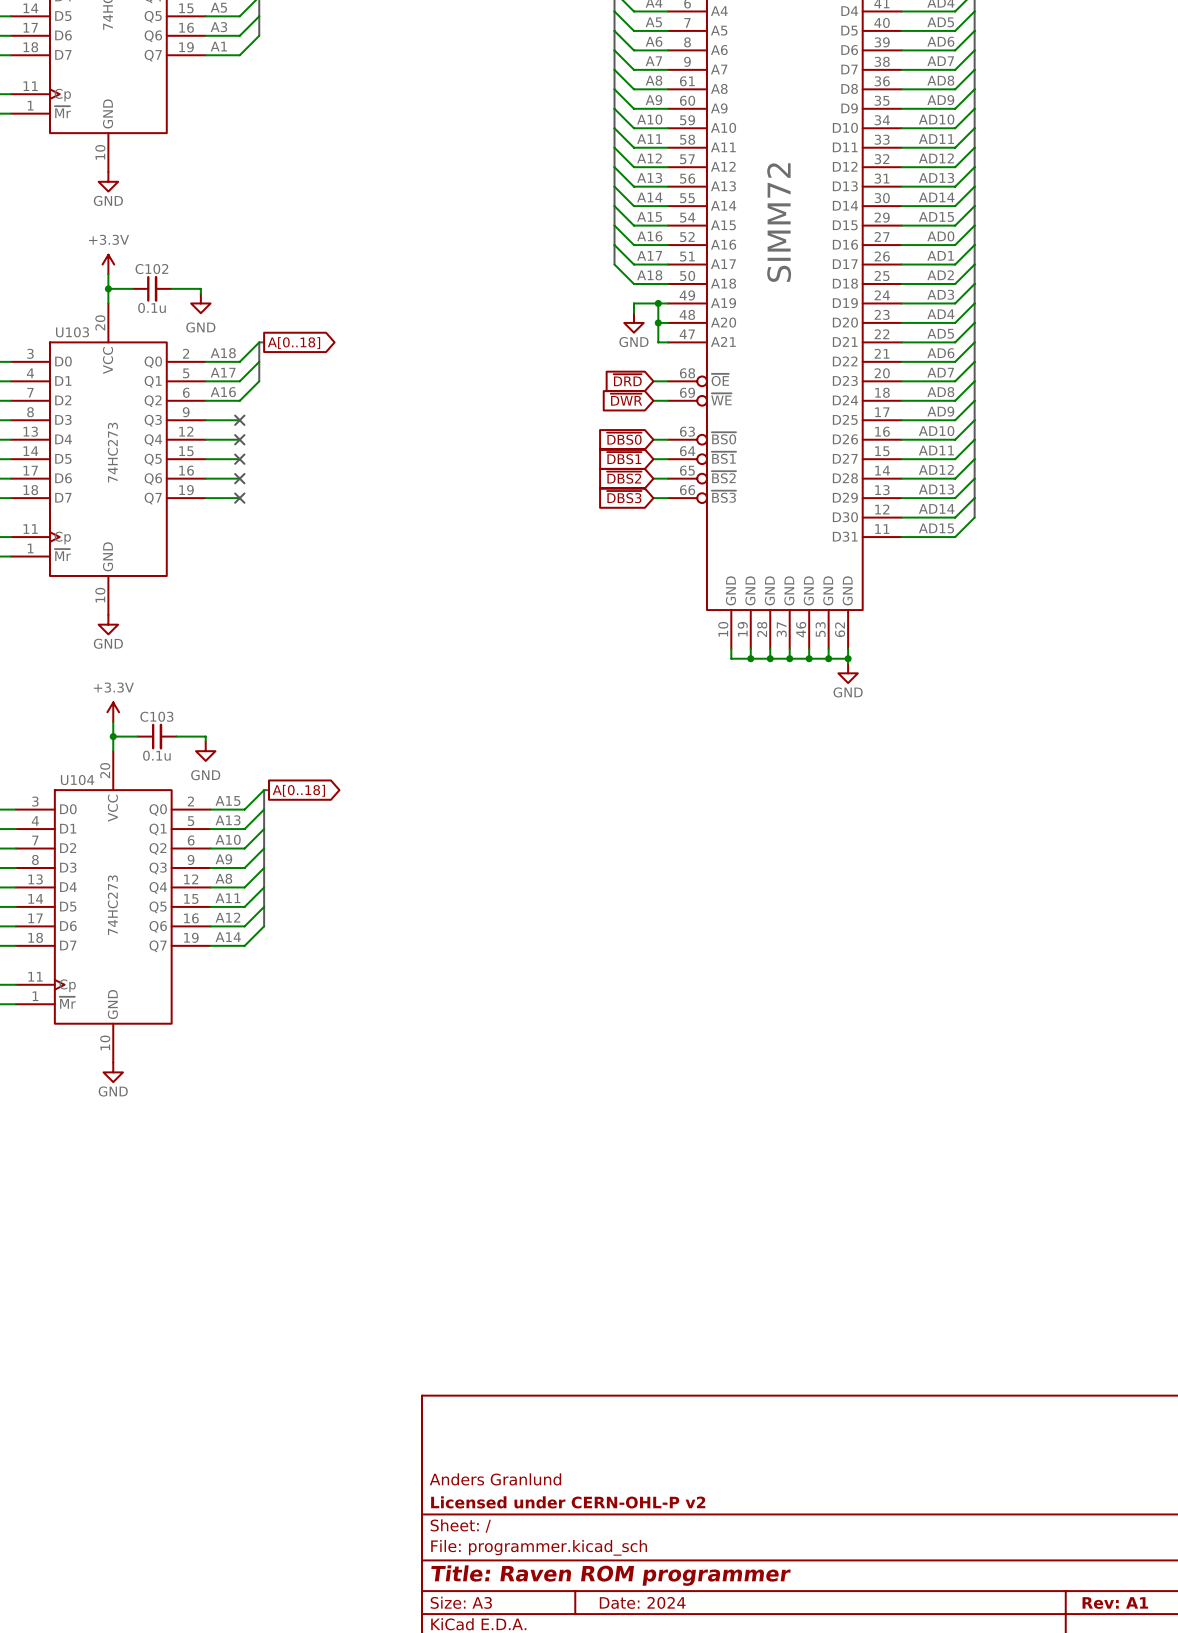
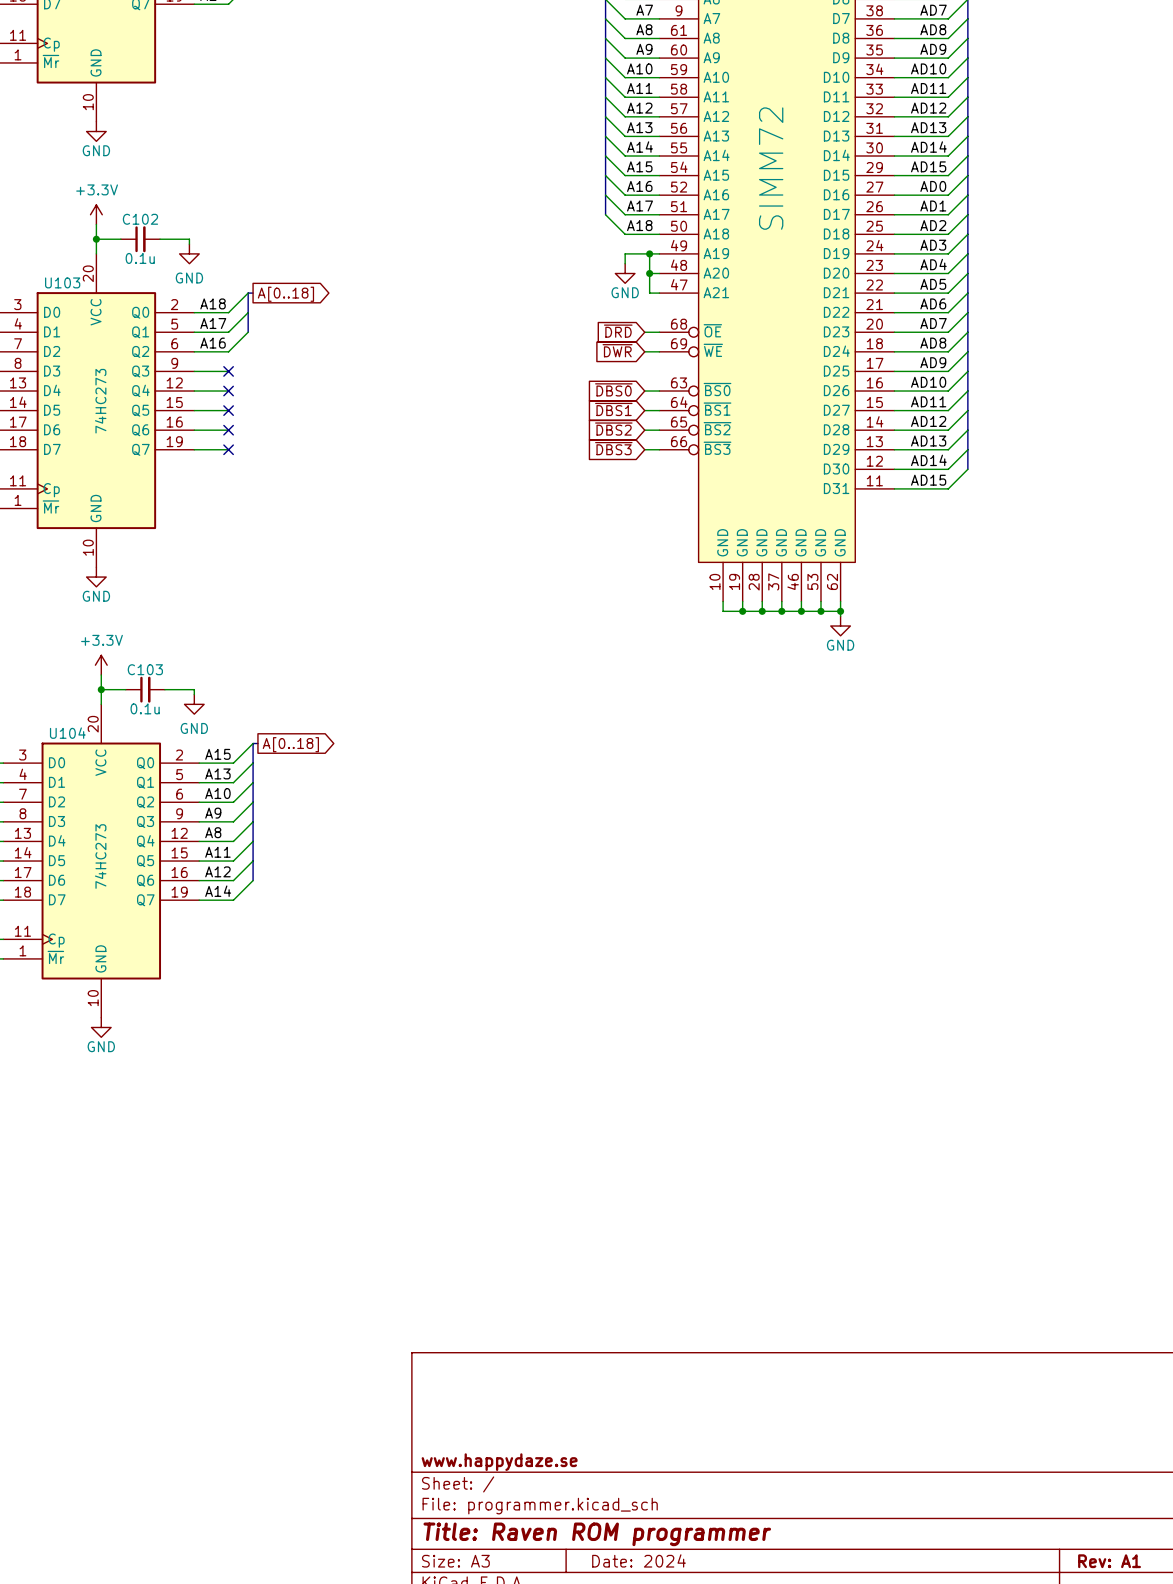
title block: Anders Granlund (495, 1479) -> none
title block: Licensed under CERN-OHL-P v2 (568, 1502) -> www.happydaze.se (499, 1462)

